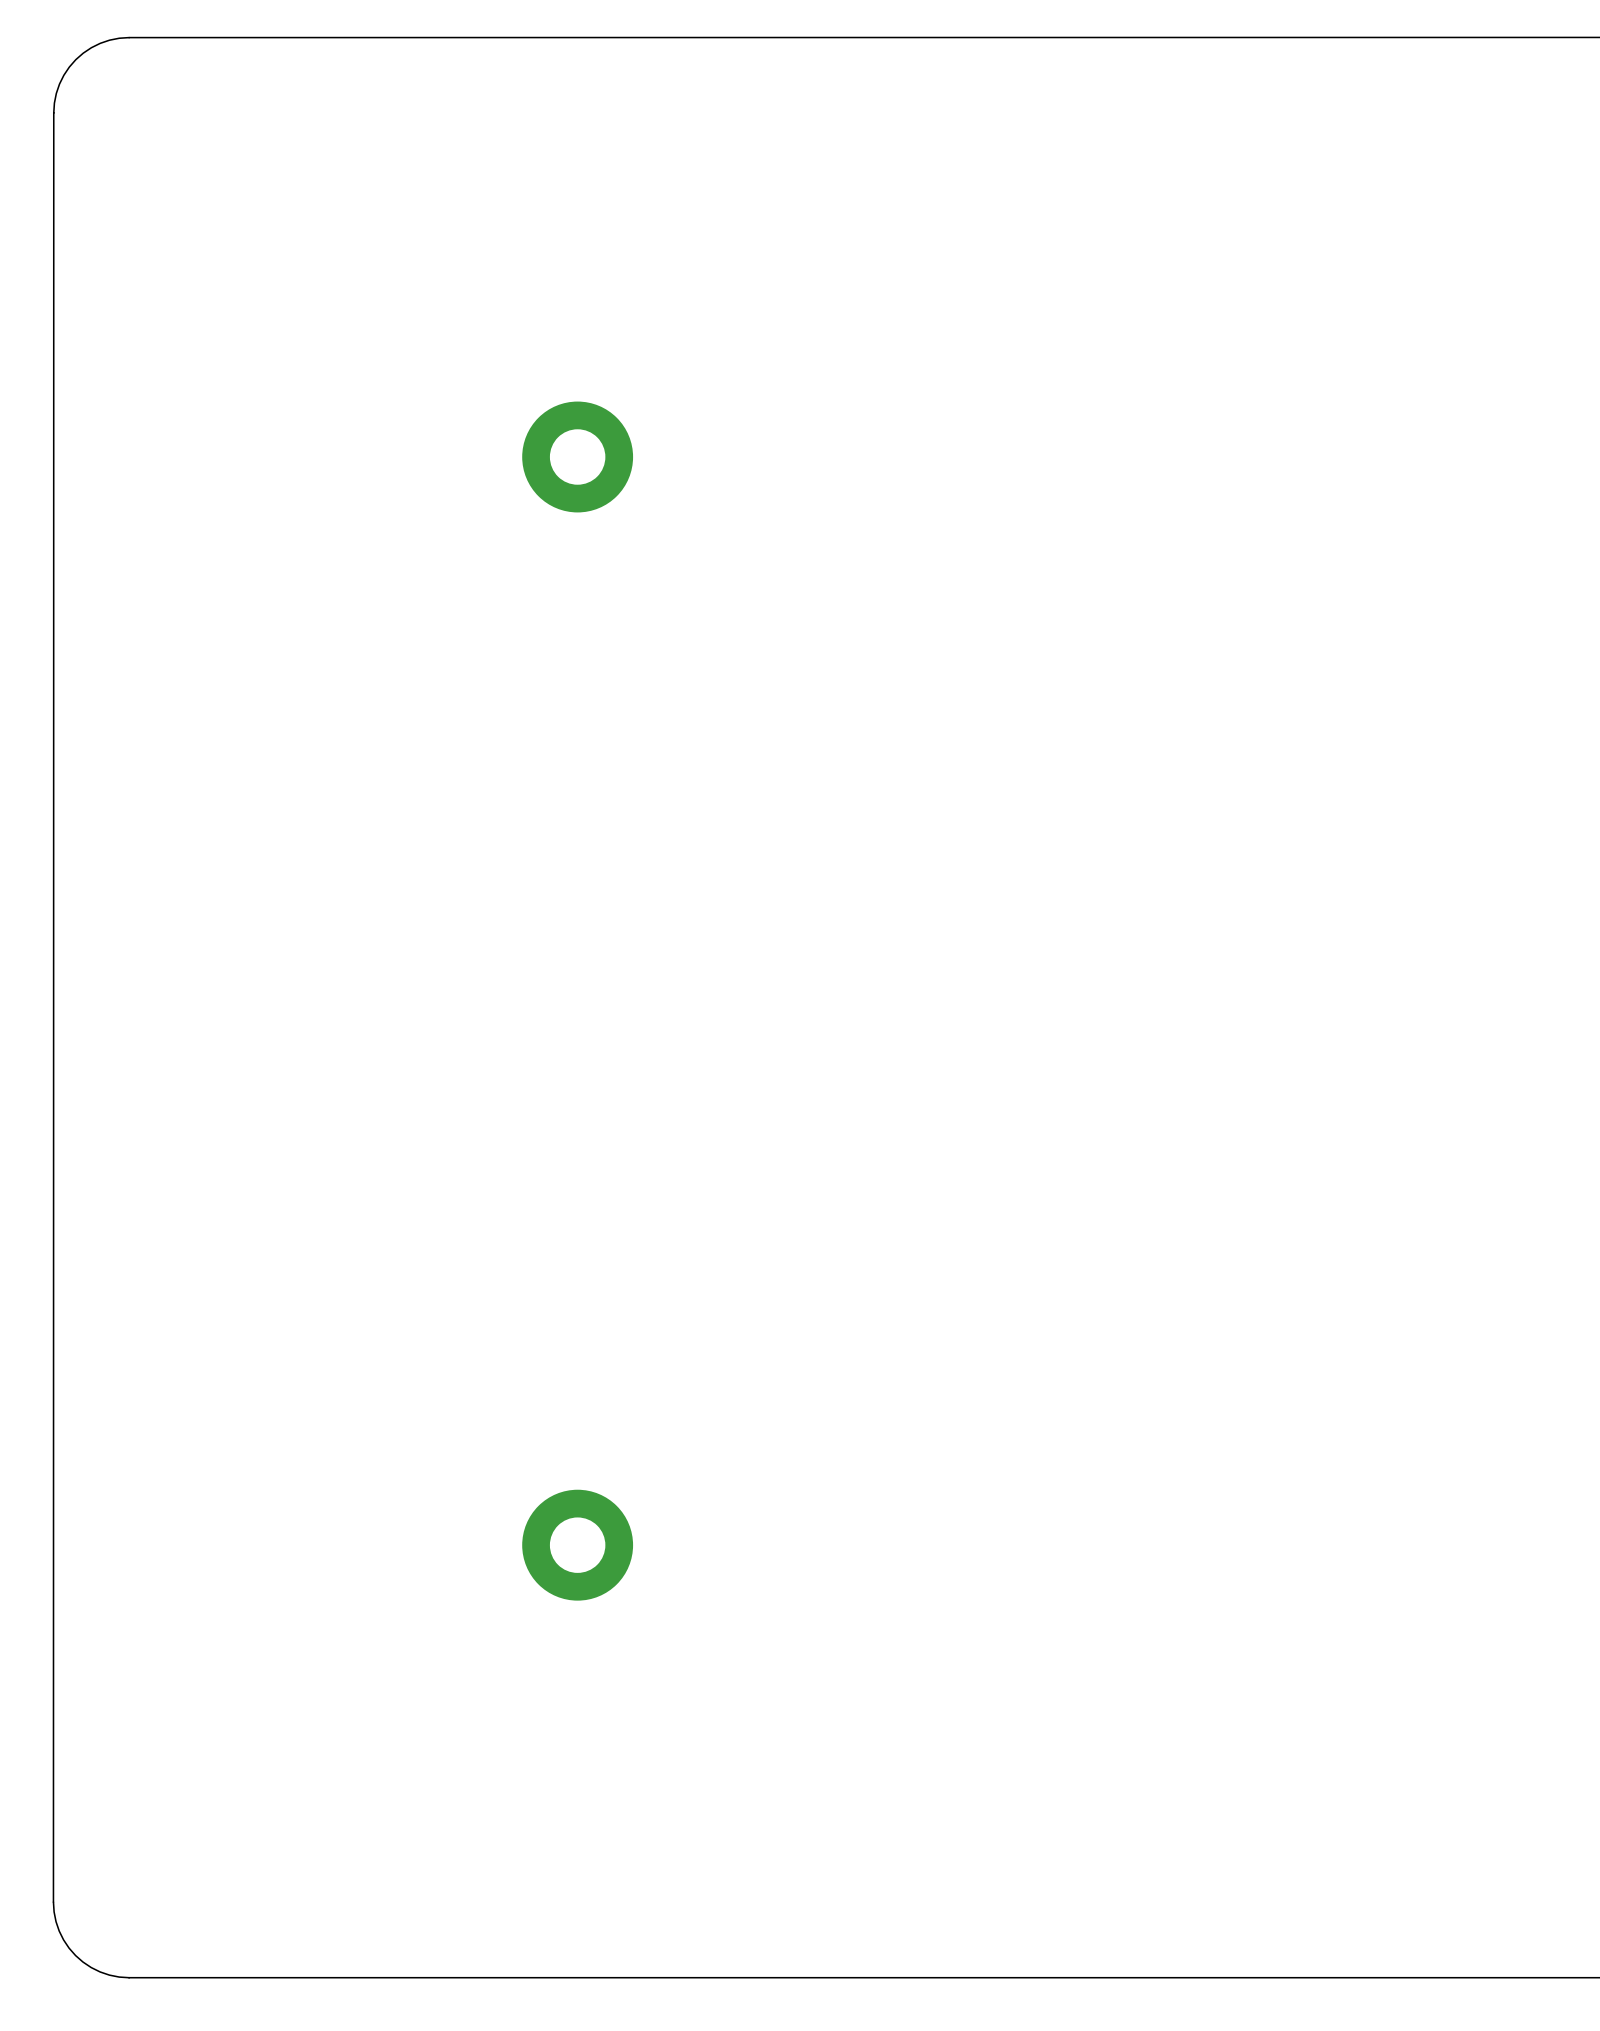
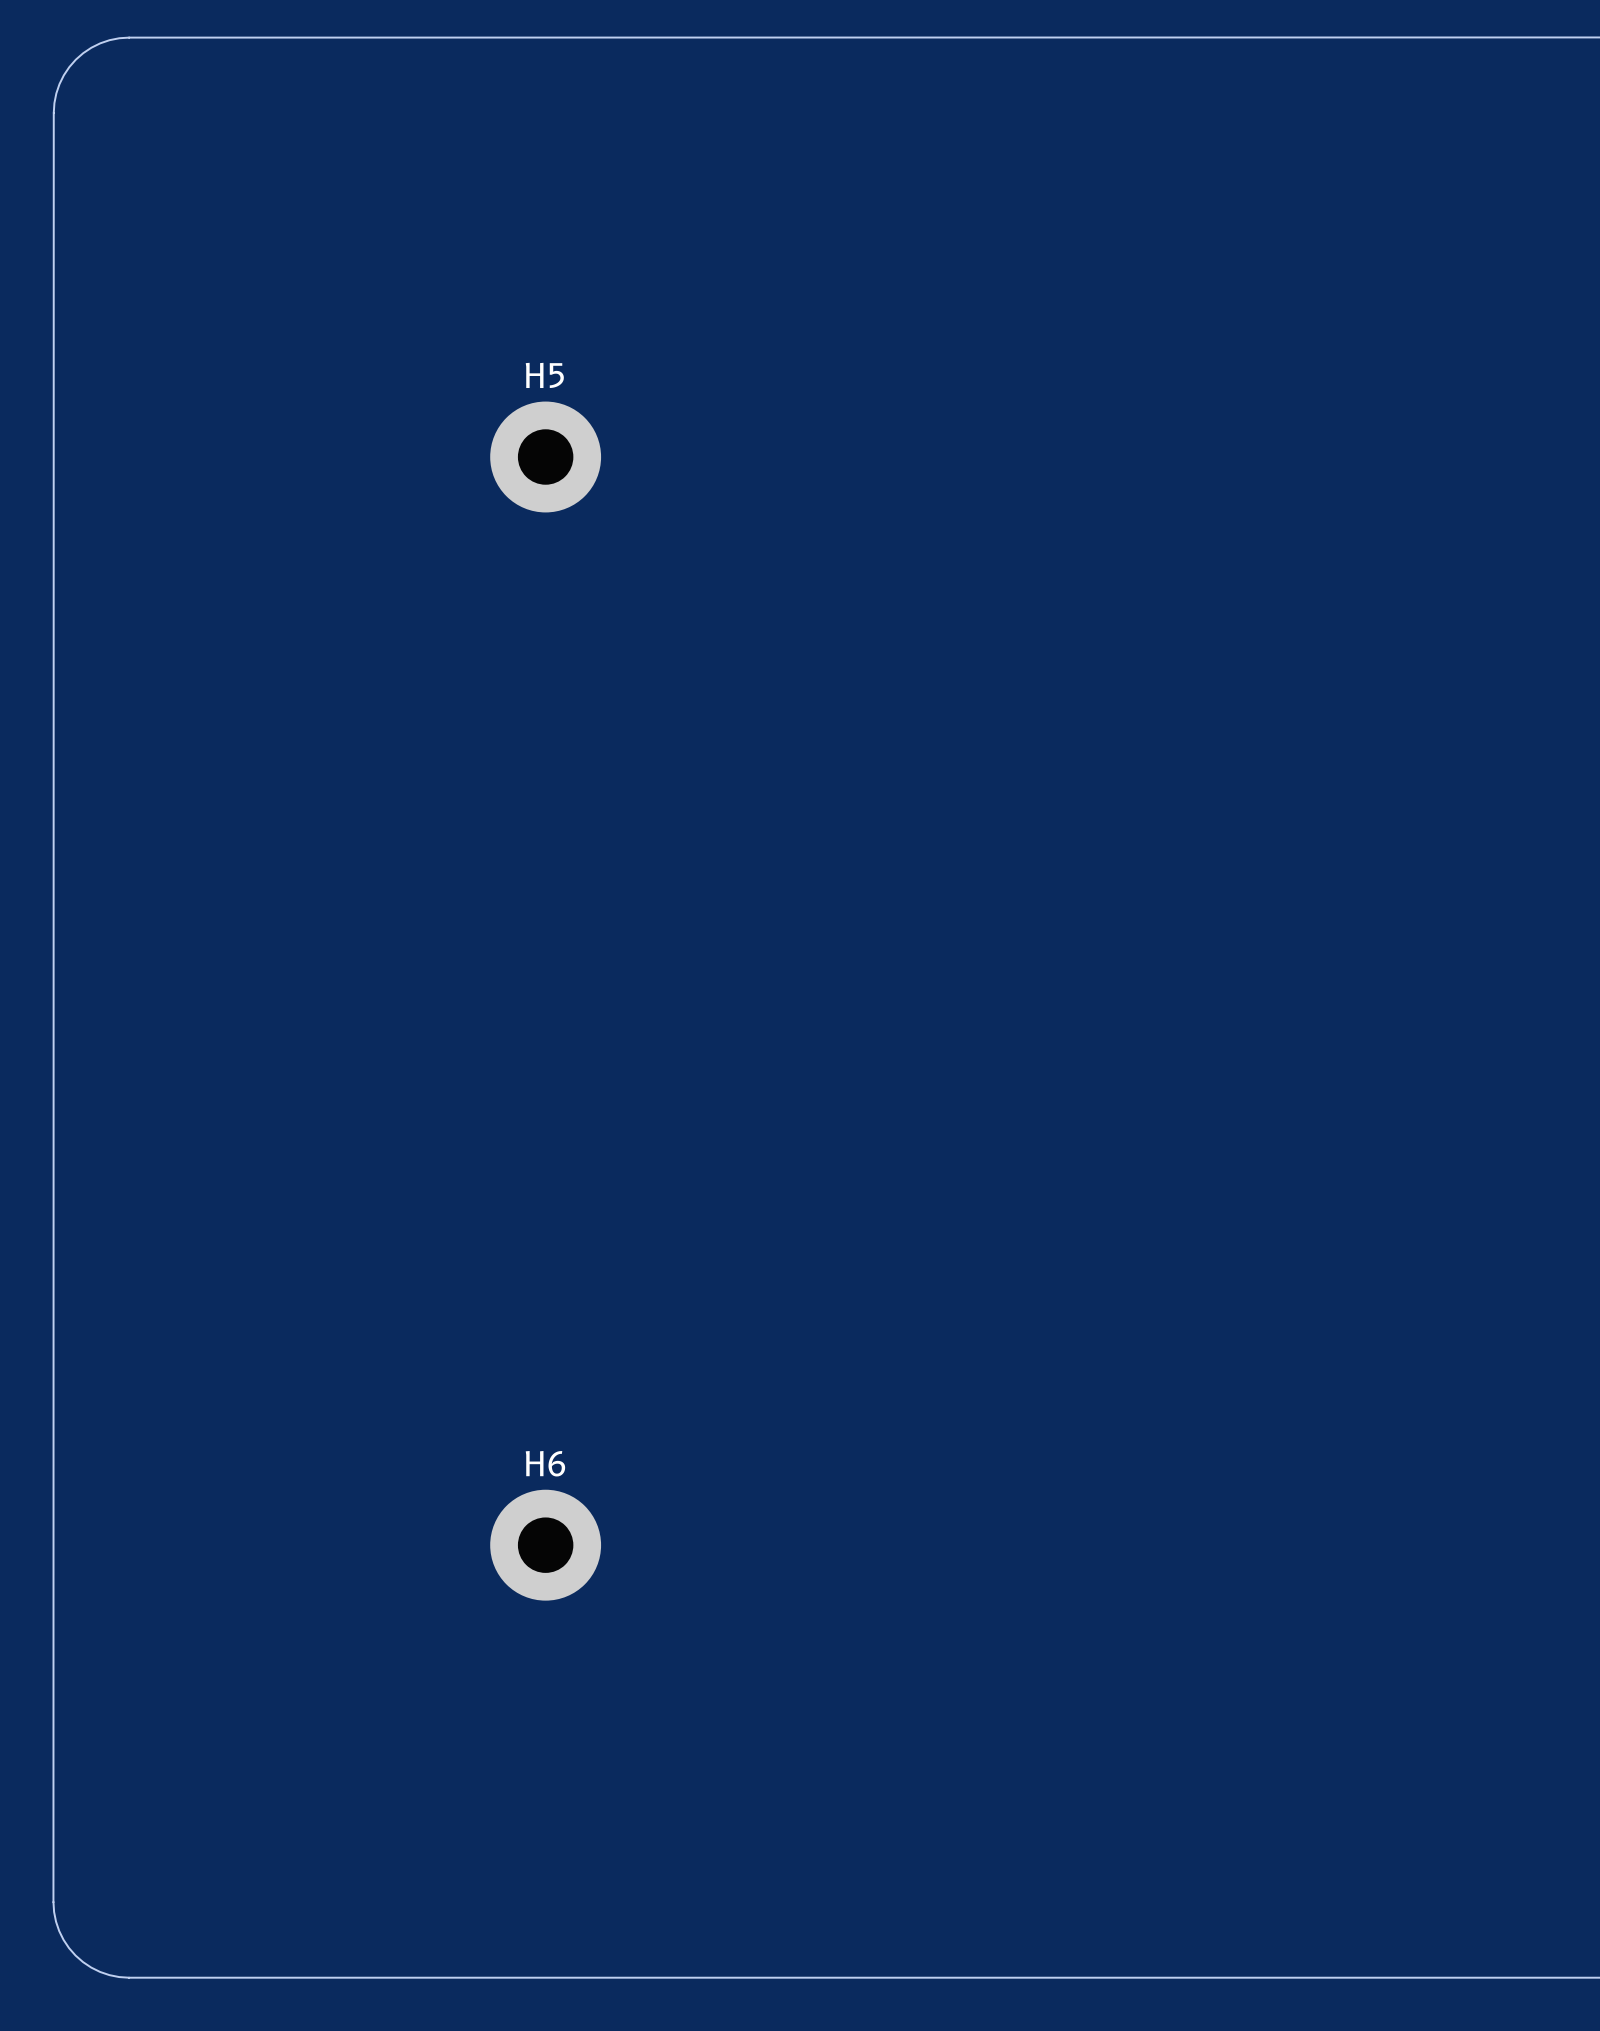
H5 position: (577, 457) -> (545, 457)
H6 position: (577, 1545) -> (545, 1545)

